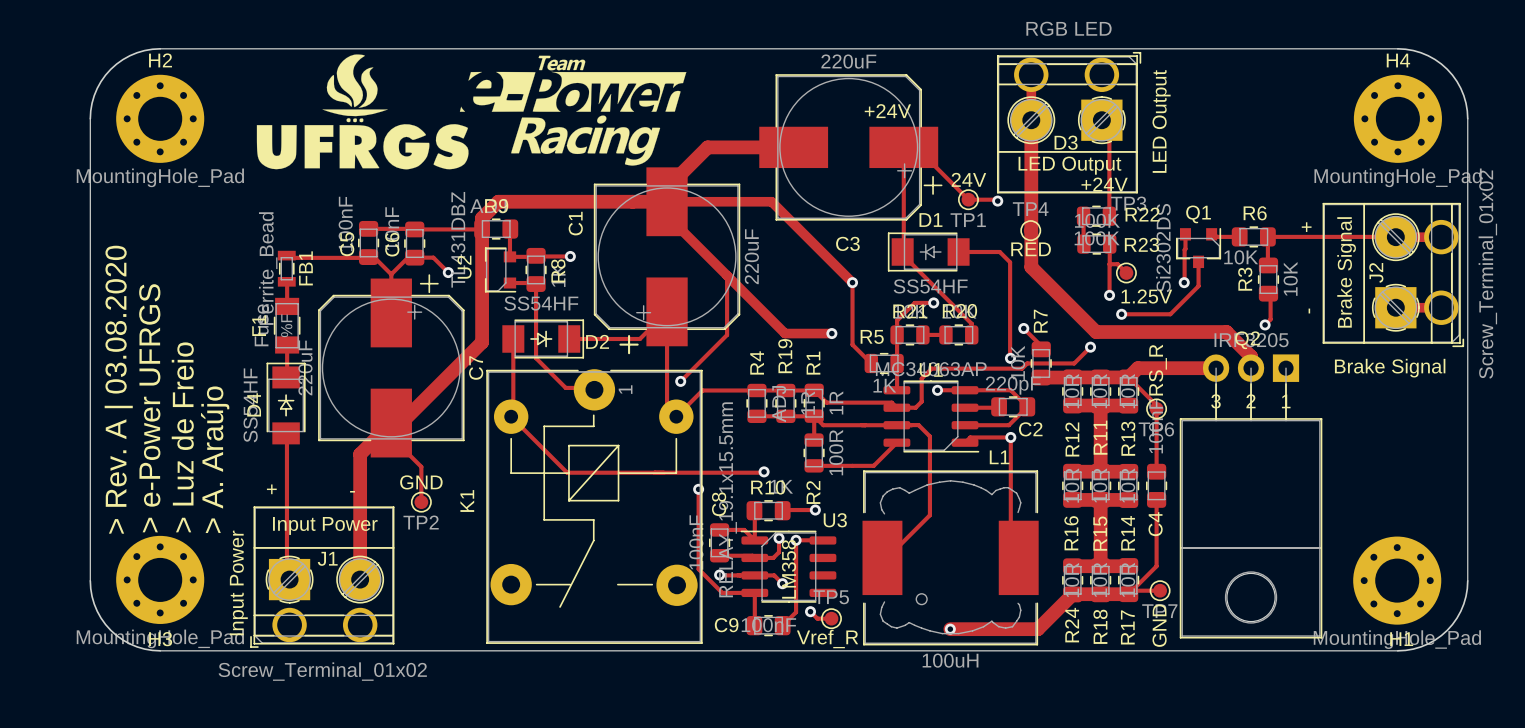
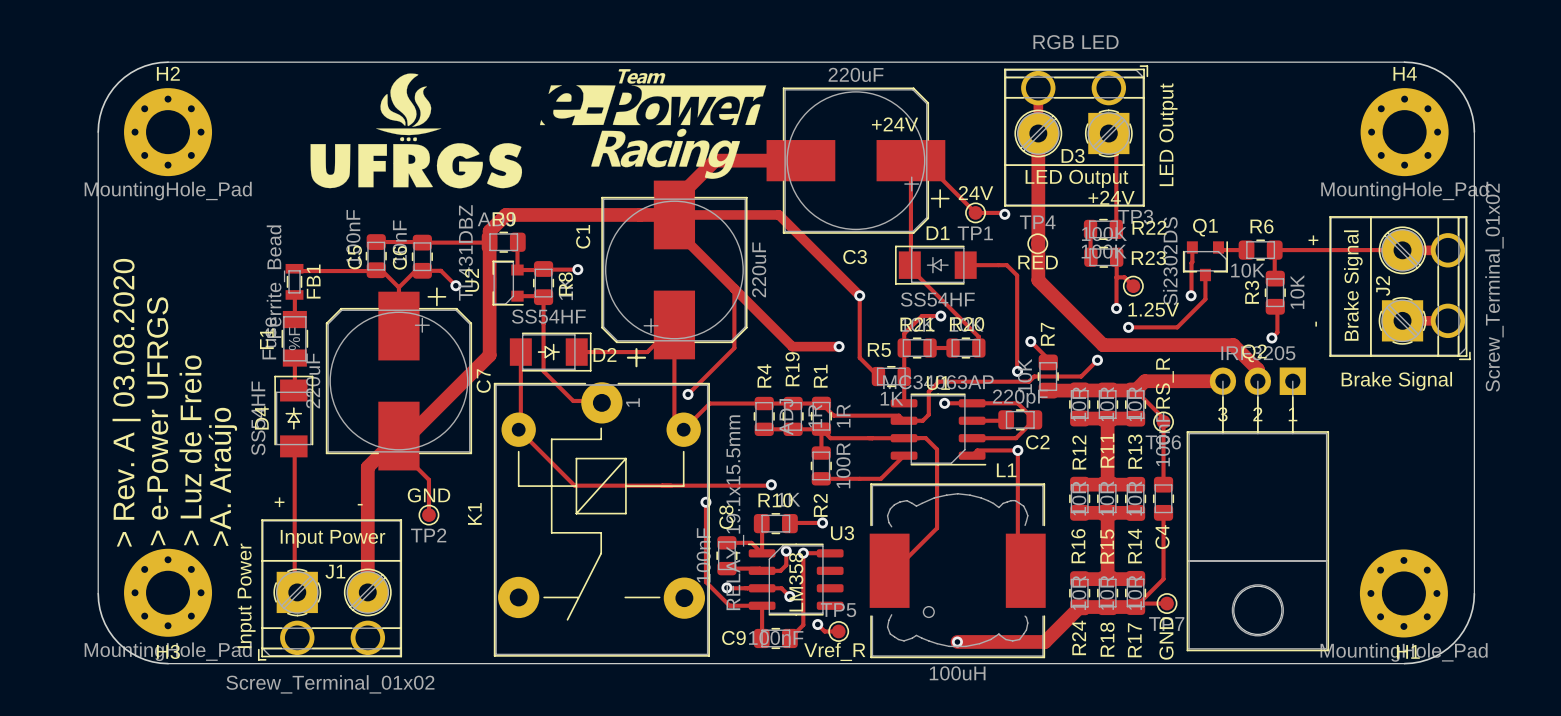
drawing position: (573, 110) -> (653, 123)
drawing position: (362, 111) -> (416, 130)
text: > A. Araújo (215, 459) -> >A. Araújo (222, 476)

